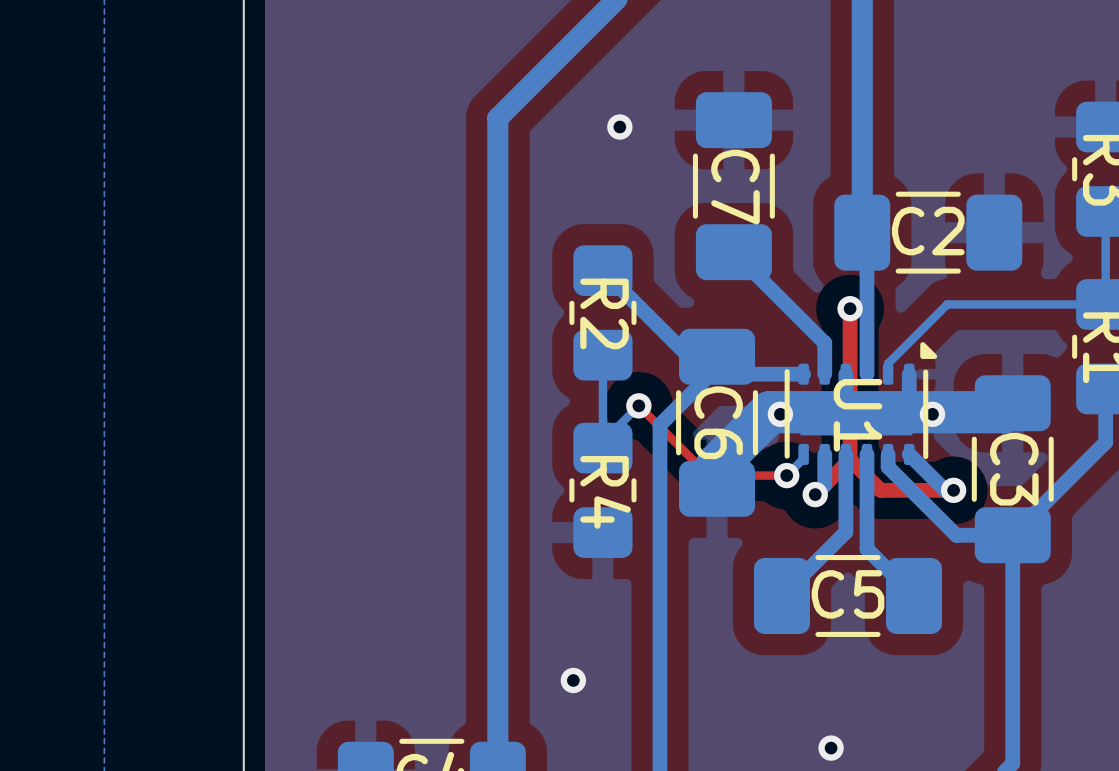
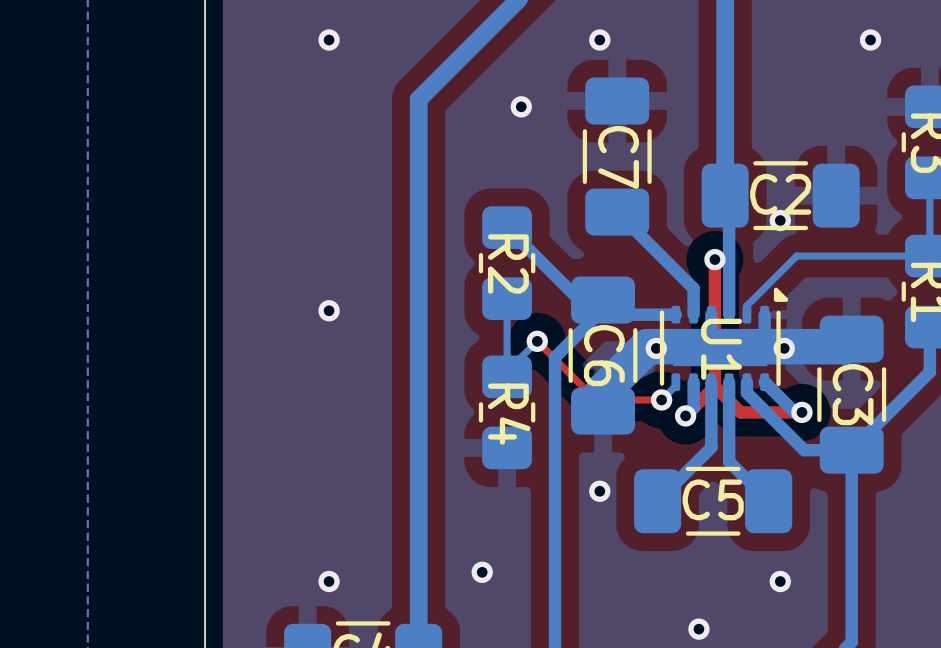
via: none -> (329, 40)
via: none -> (599, 40)
via: none -> (870, 40)
via: none -> (780, 220)
via: none -> (329, 310)
via: none -> (599, 491)
via: none -> (329, 581)
via: none -> (780, 581)

